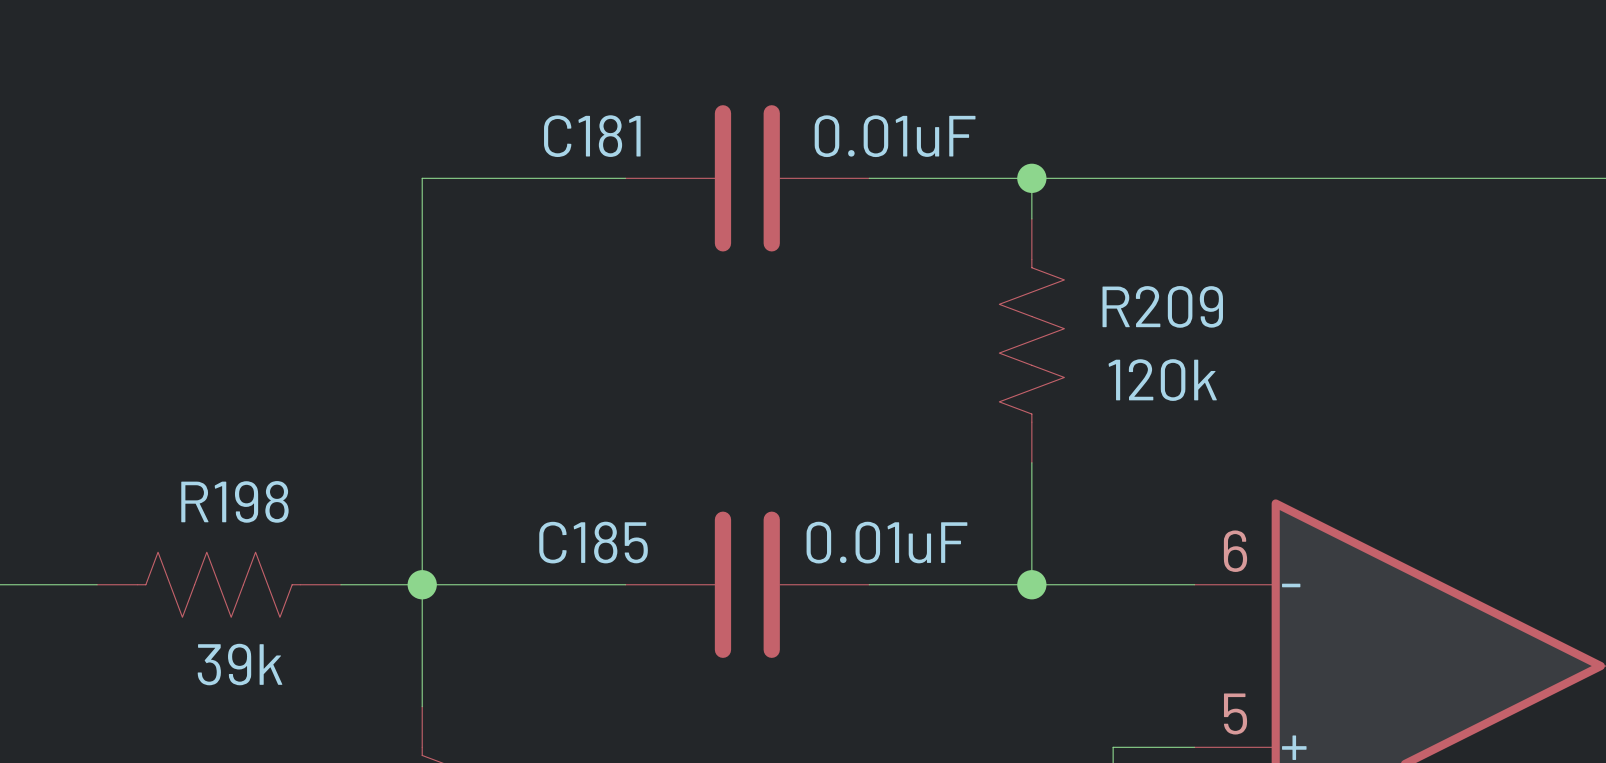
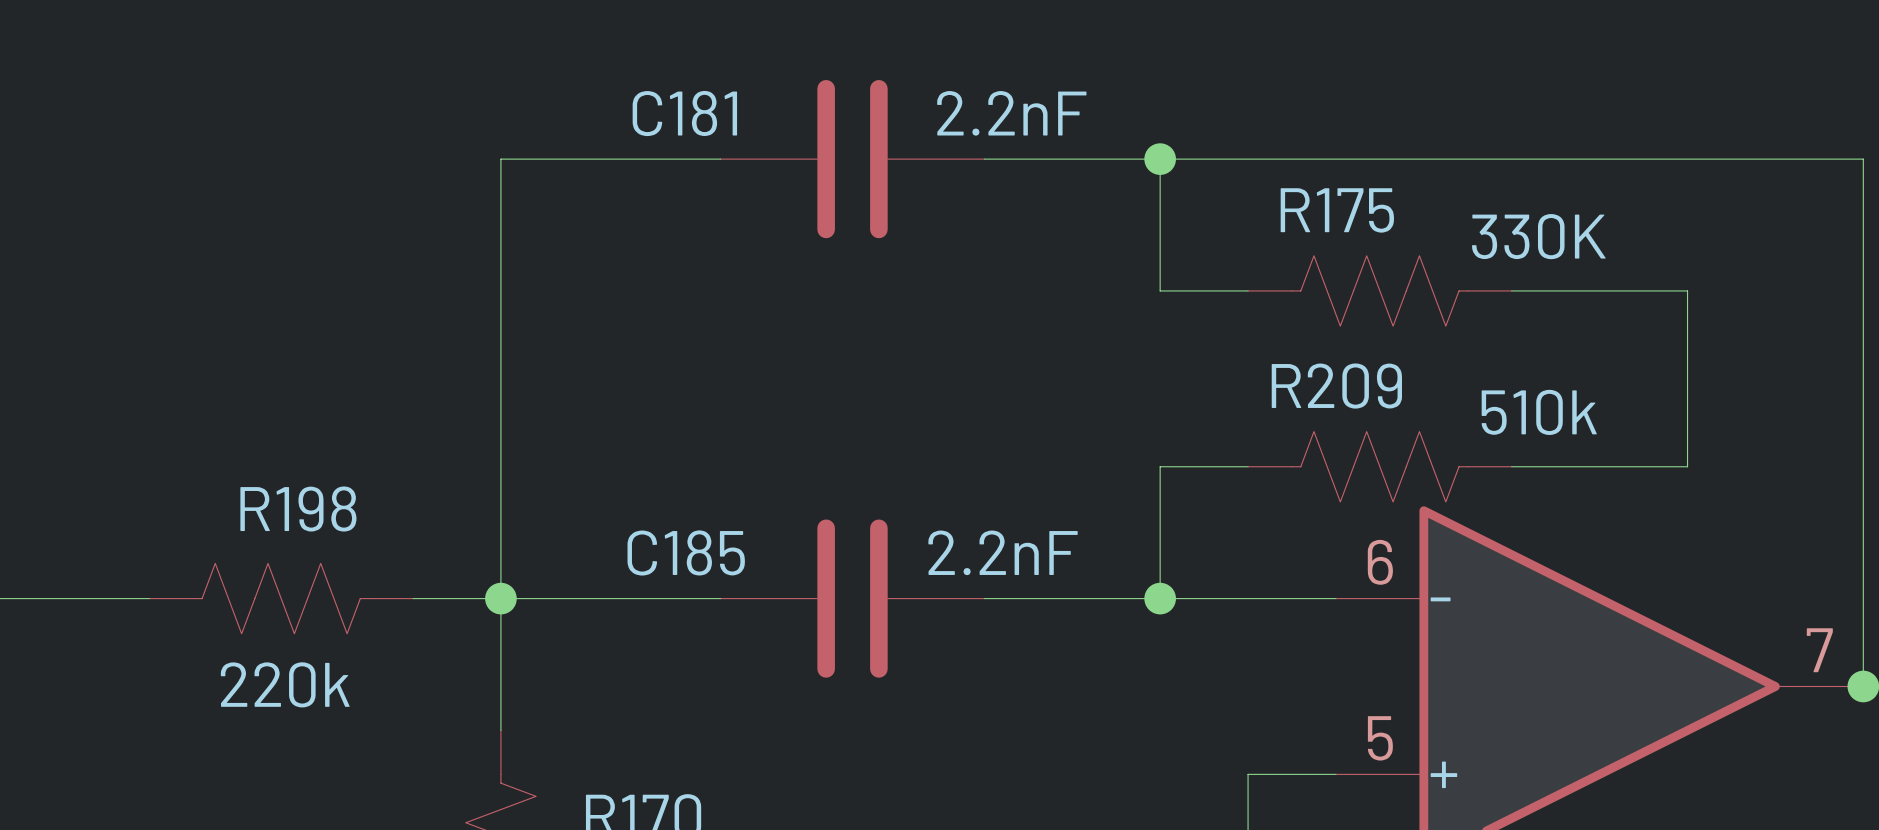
C181 value: 0.01uF (895, 136) -> 2.2nF (1011, 113)
wire: none -> (1160, 203) (1160, 290) (1248, 290)
R175: none -> 330K (1379, 290)
wire: none -> (1511, 290) (1687, 290) (1687, 466) (1511, 466)
R209 name position: R209 (1162, 306) -> R209 (1336, 386)
R209 rotation: 0° (1031, 340) -> 90° clockwise (1379, 466)
R209 position: (1031, 340) -> (1379, 466)
R209 value: 120k (1162, 380) -> 510k (1539, 412)
wire: none -> (1160, 466) (1248, 466)
C185 value: 0.01uF (886, 542) -> 2.2nF (1003, 552)
R198 value: 39k (240, 664) -> 220k (285, 684)

